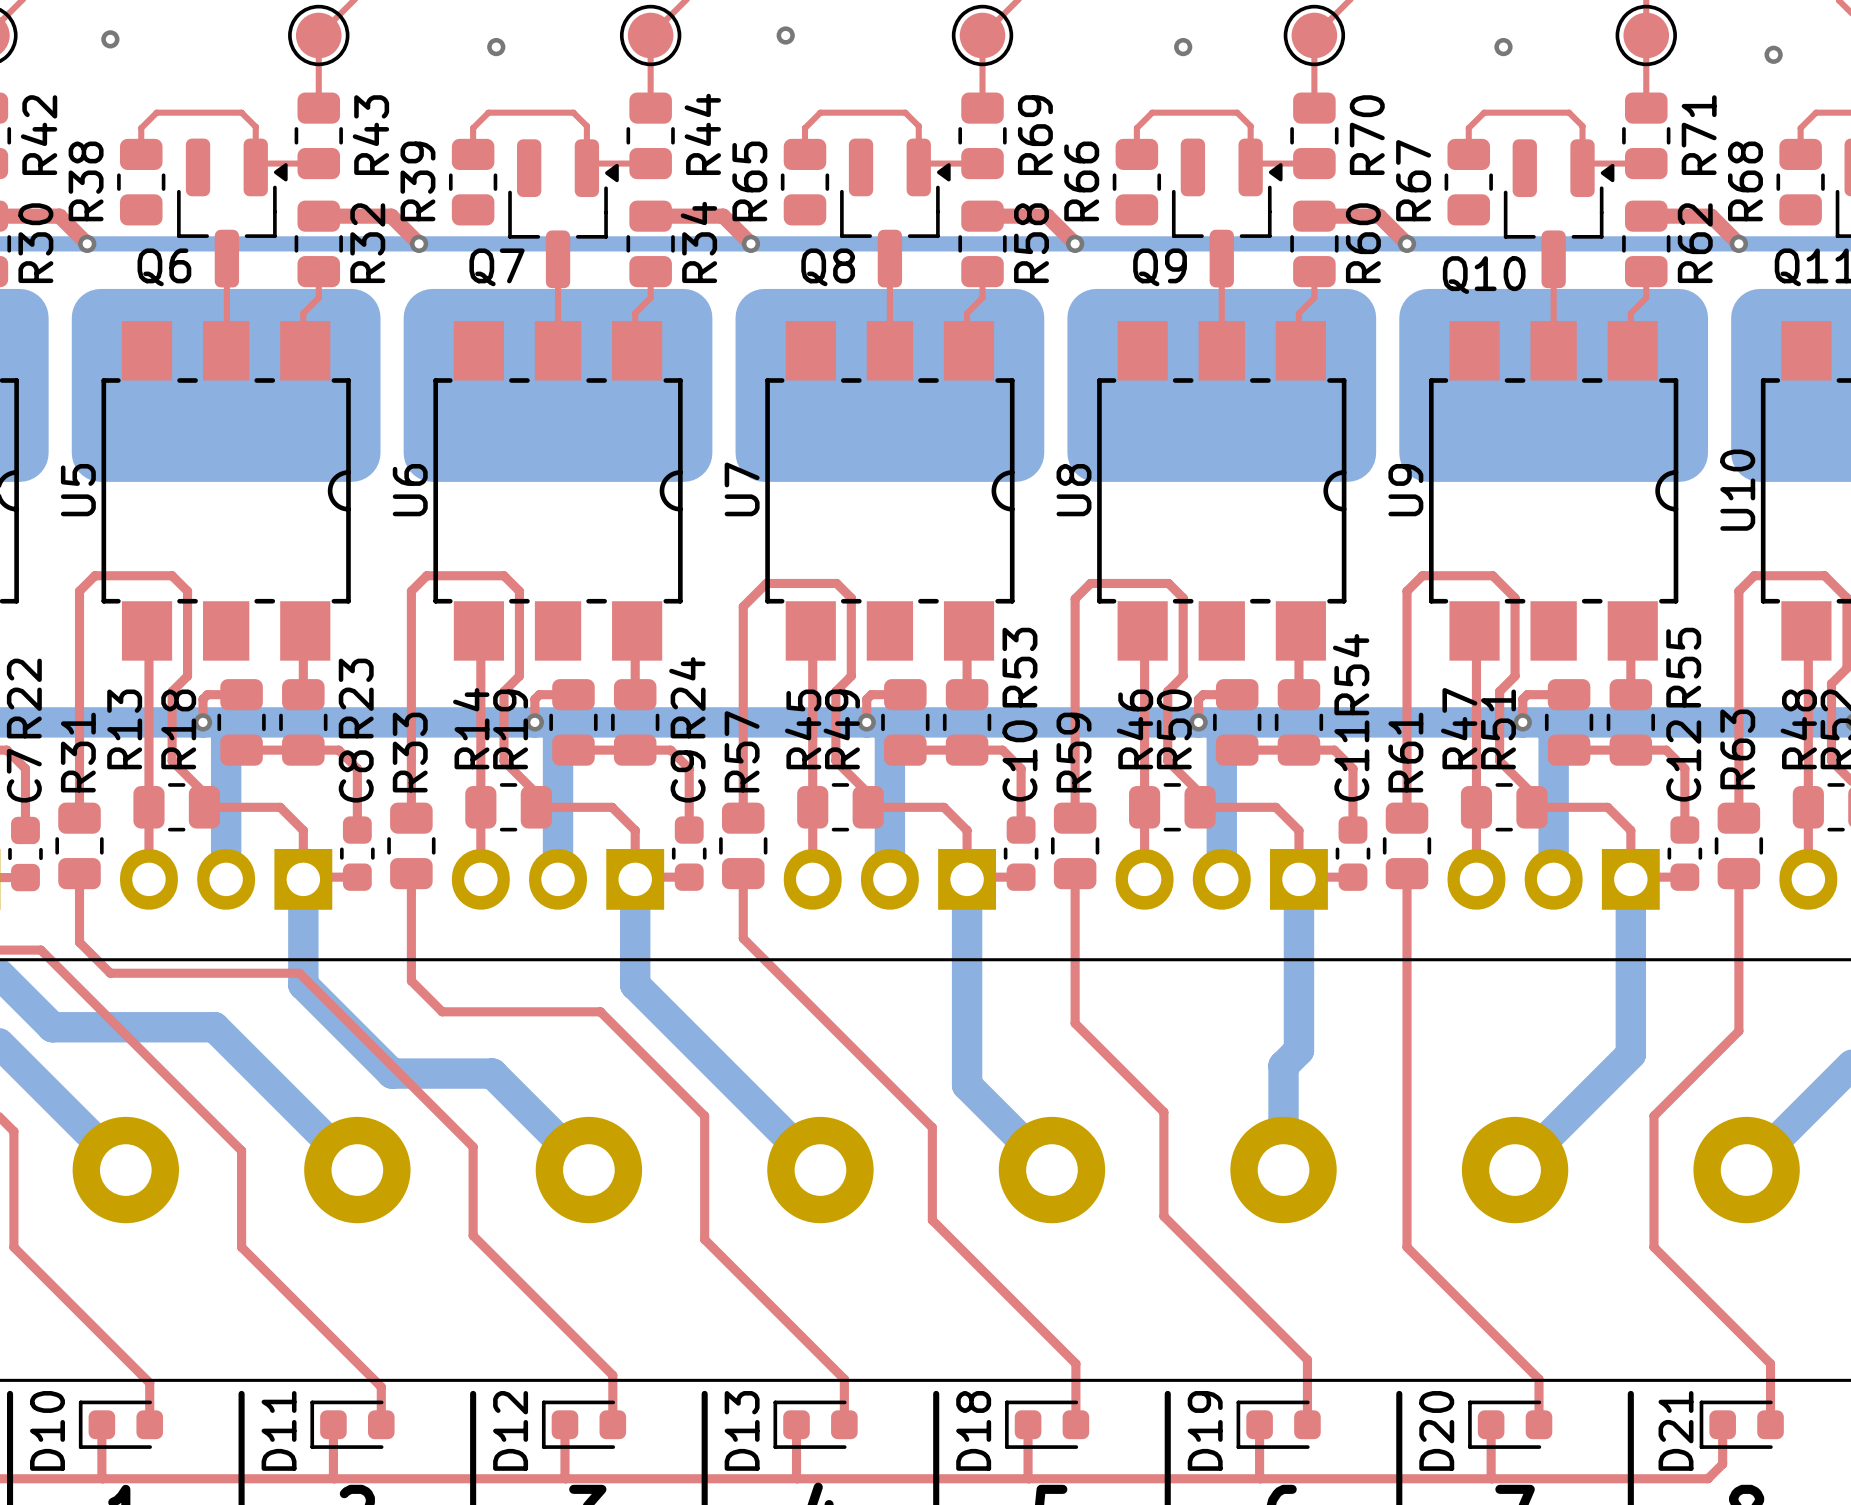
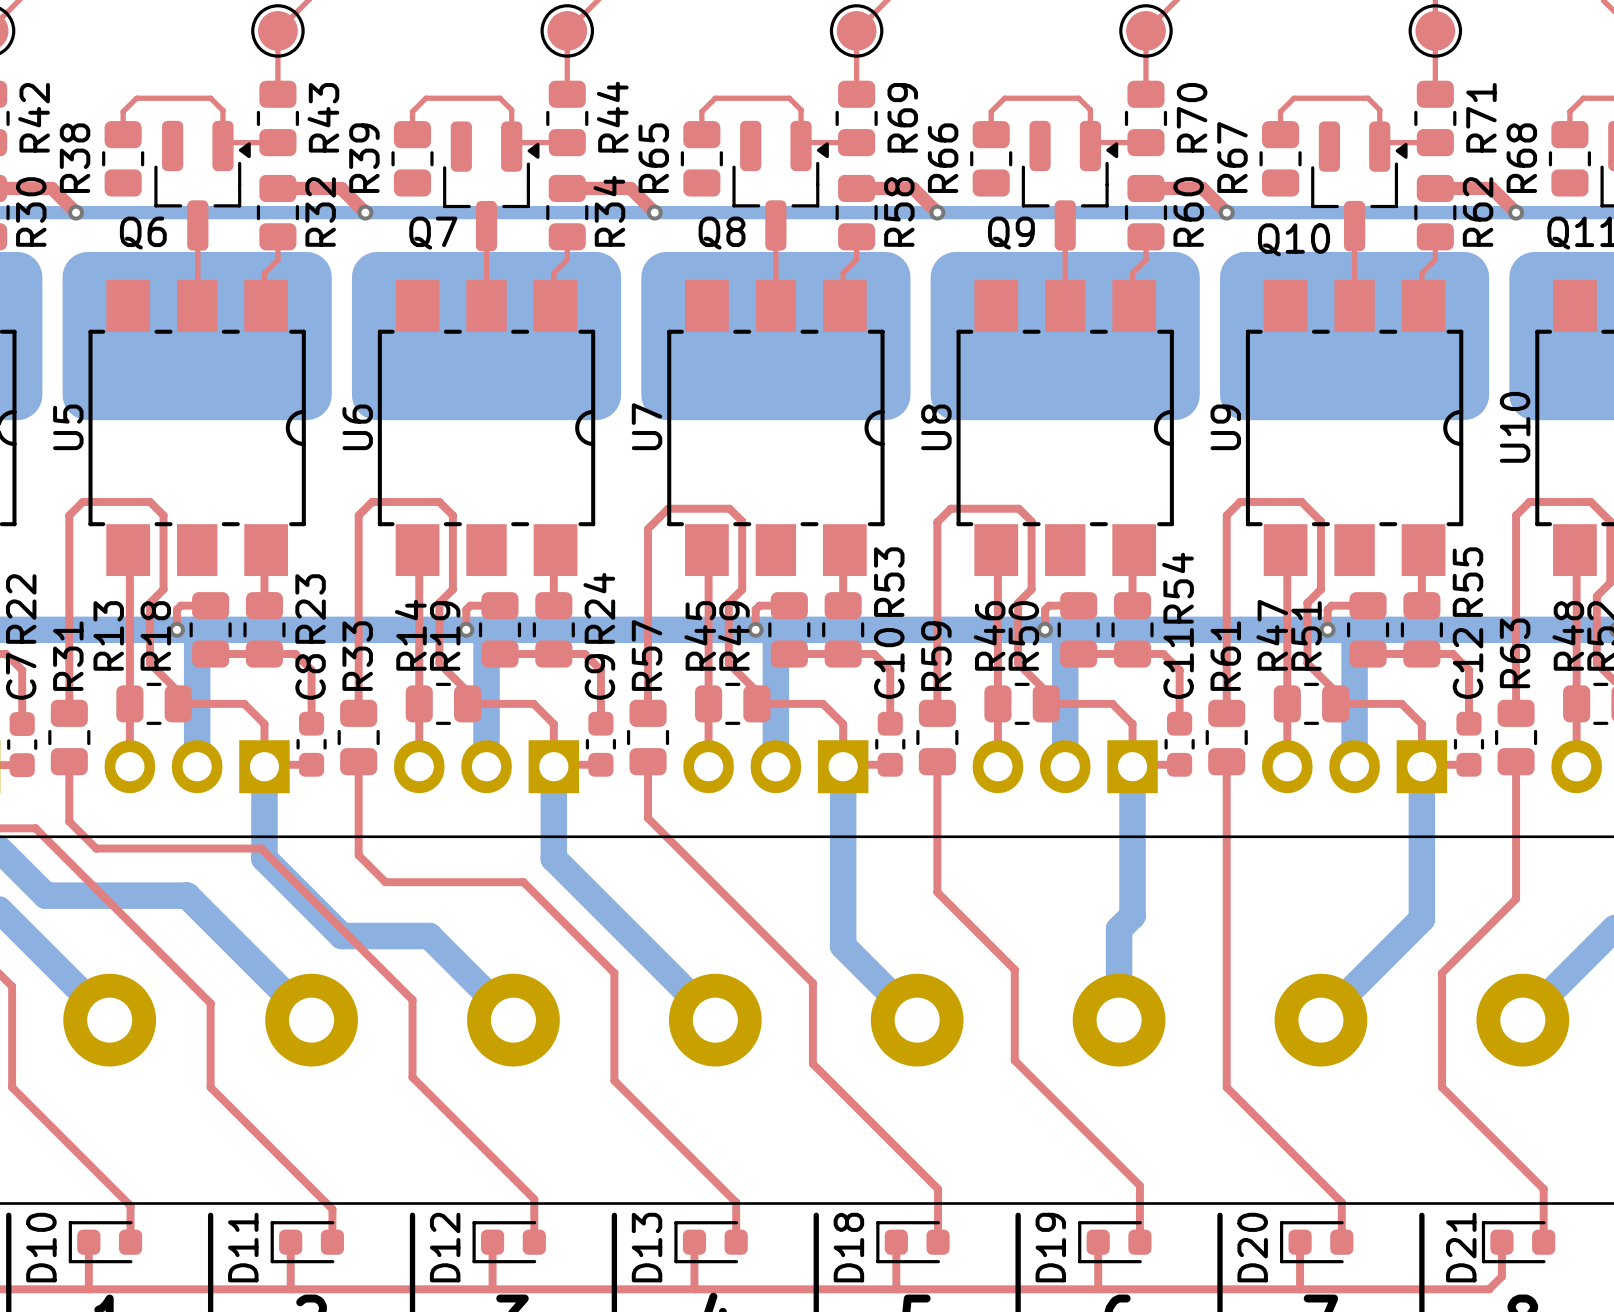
via: (785, 35) -> none
via: (110, 39) -> none
via: (496, 47) -> none
via: (1183, 47) -> none
via: (1503, 47) -> none
via: (1773, 54) -> none

